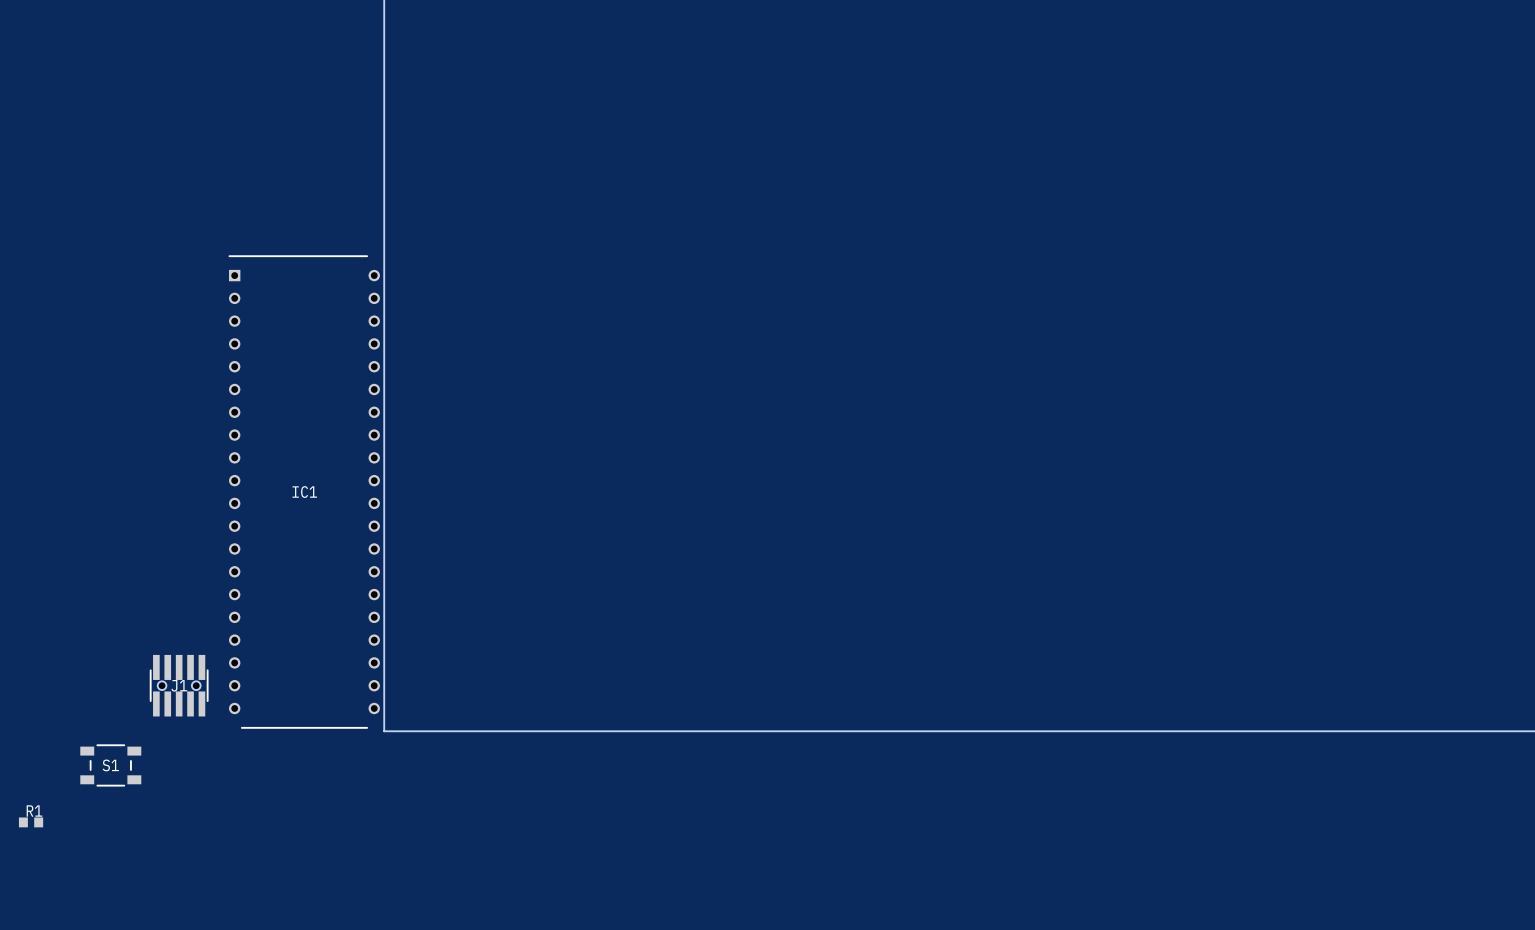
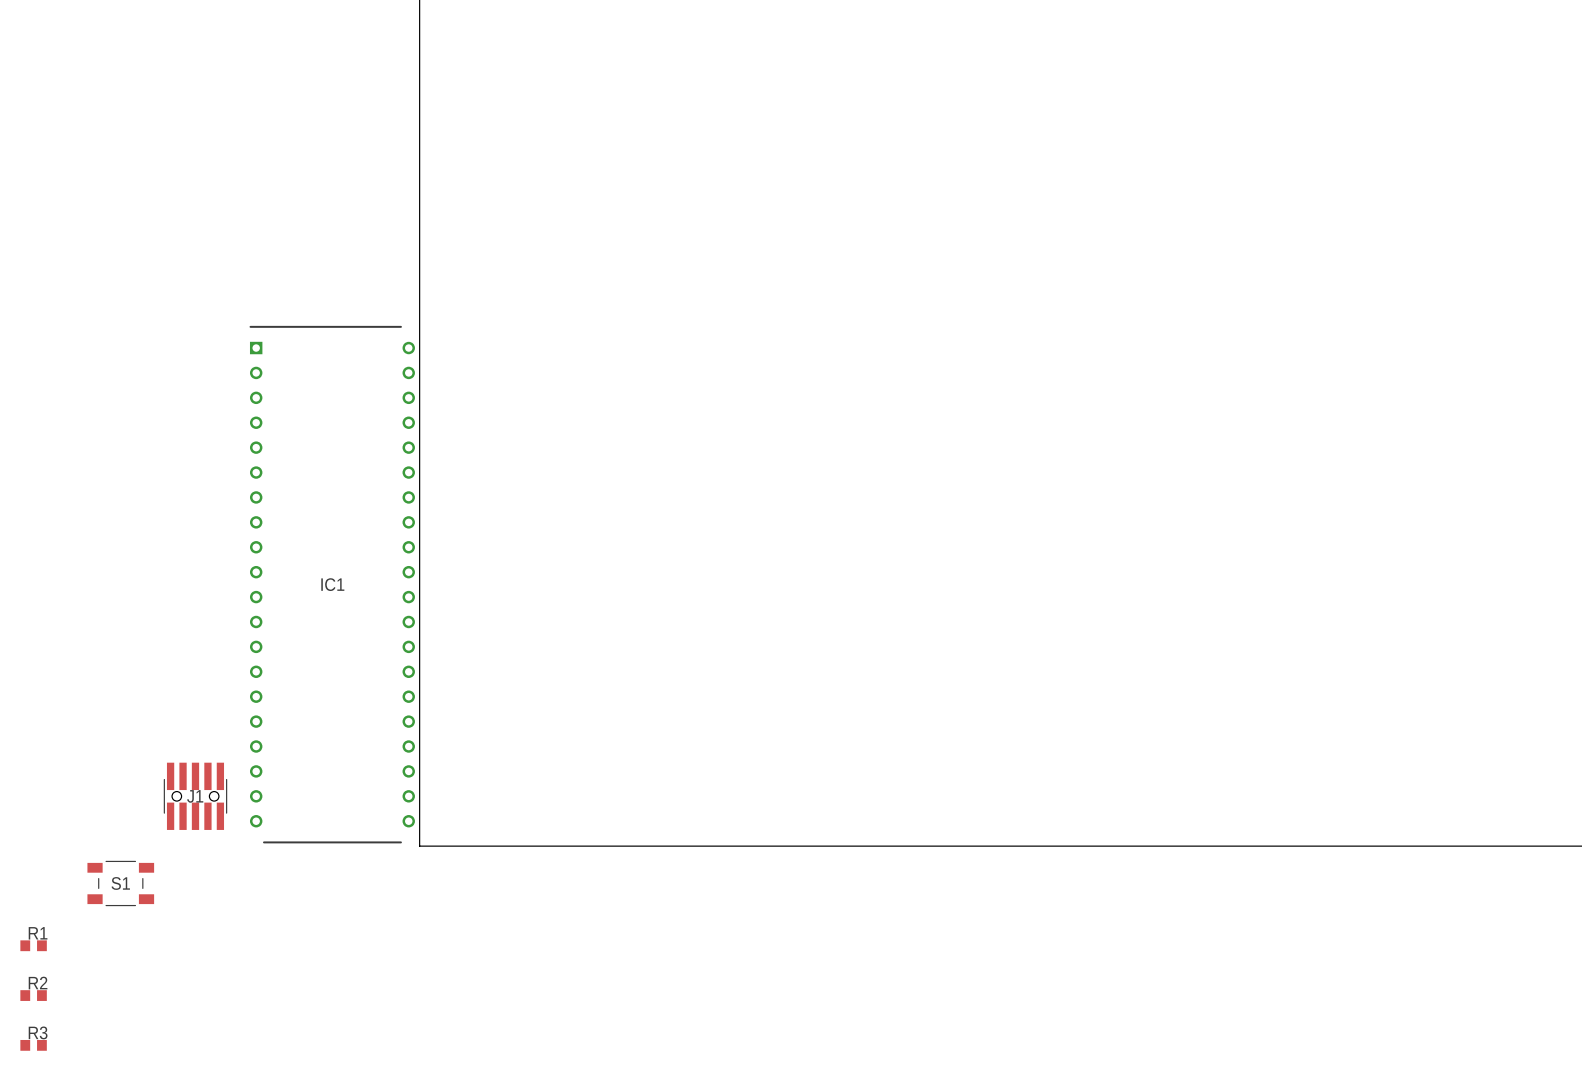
R2: none -> (33, 995)
R3: none -> (33, 1045)

